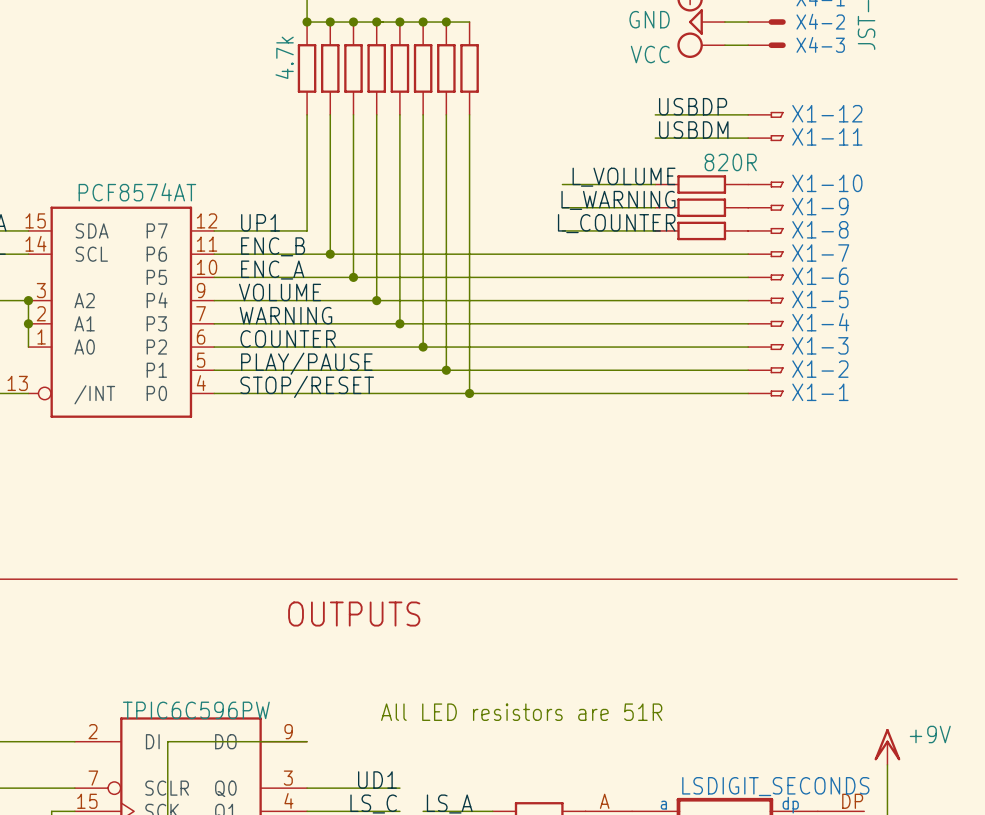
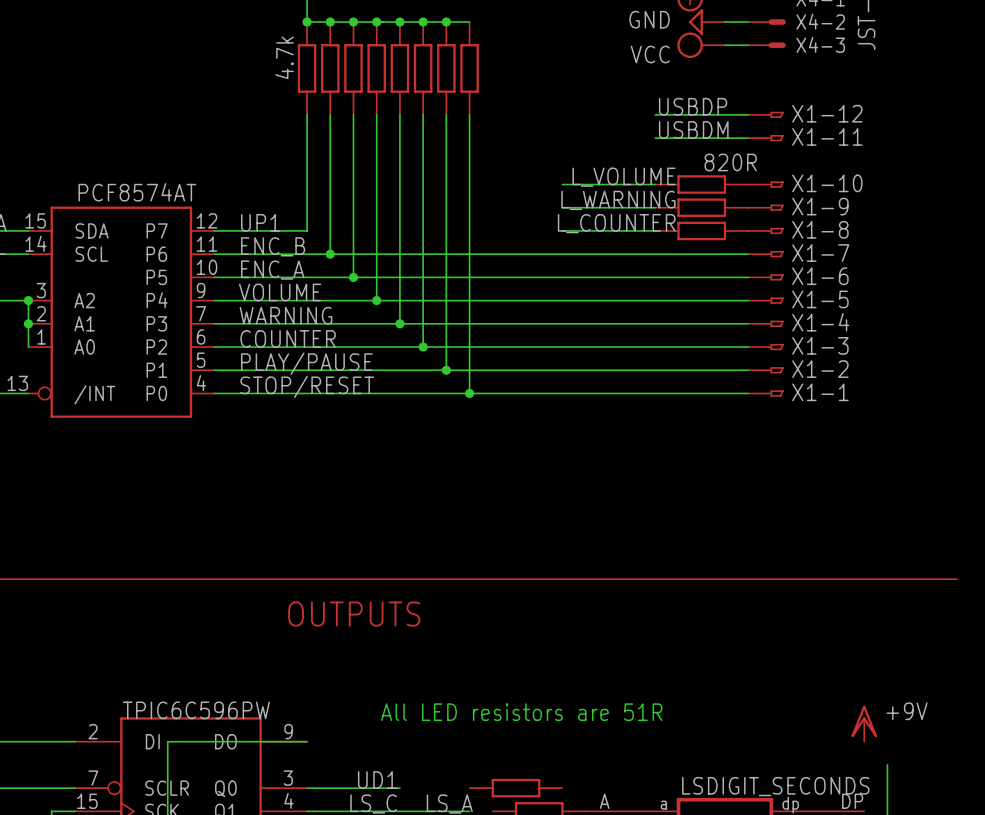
power symbol position: +9V (887, 746) -> +9V (864, 723)
part: none -> (516, 788)
wire: (469, 811) (492, 811) -> (399, 811) (423, 811)

